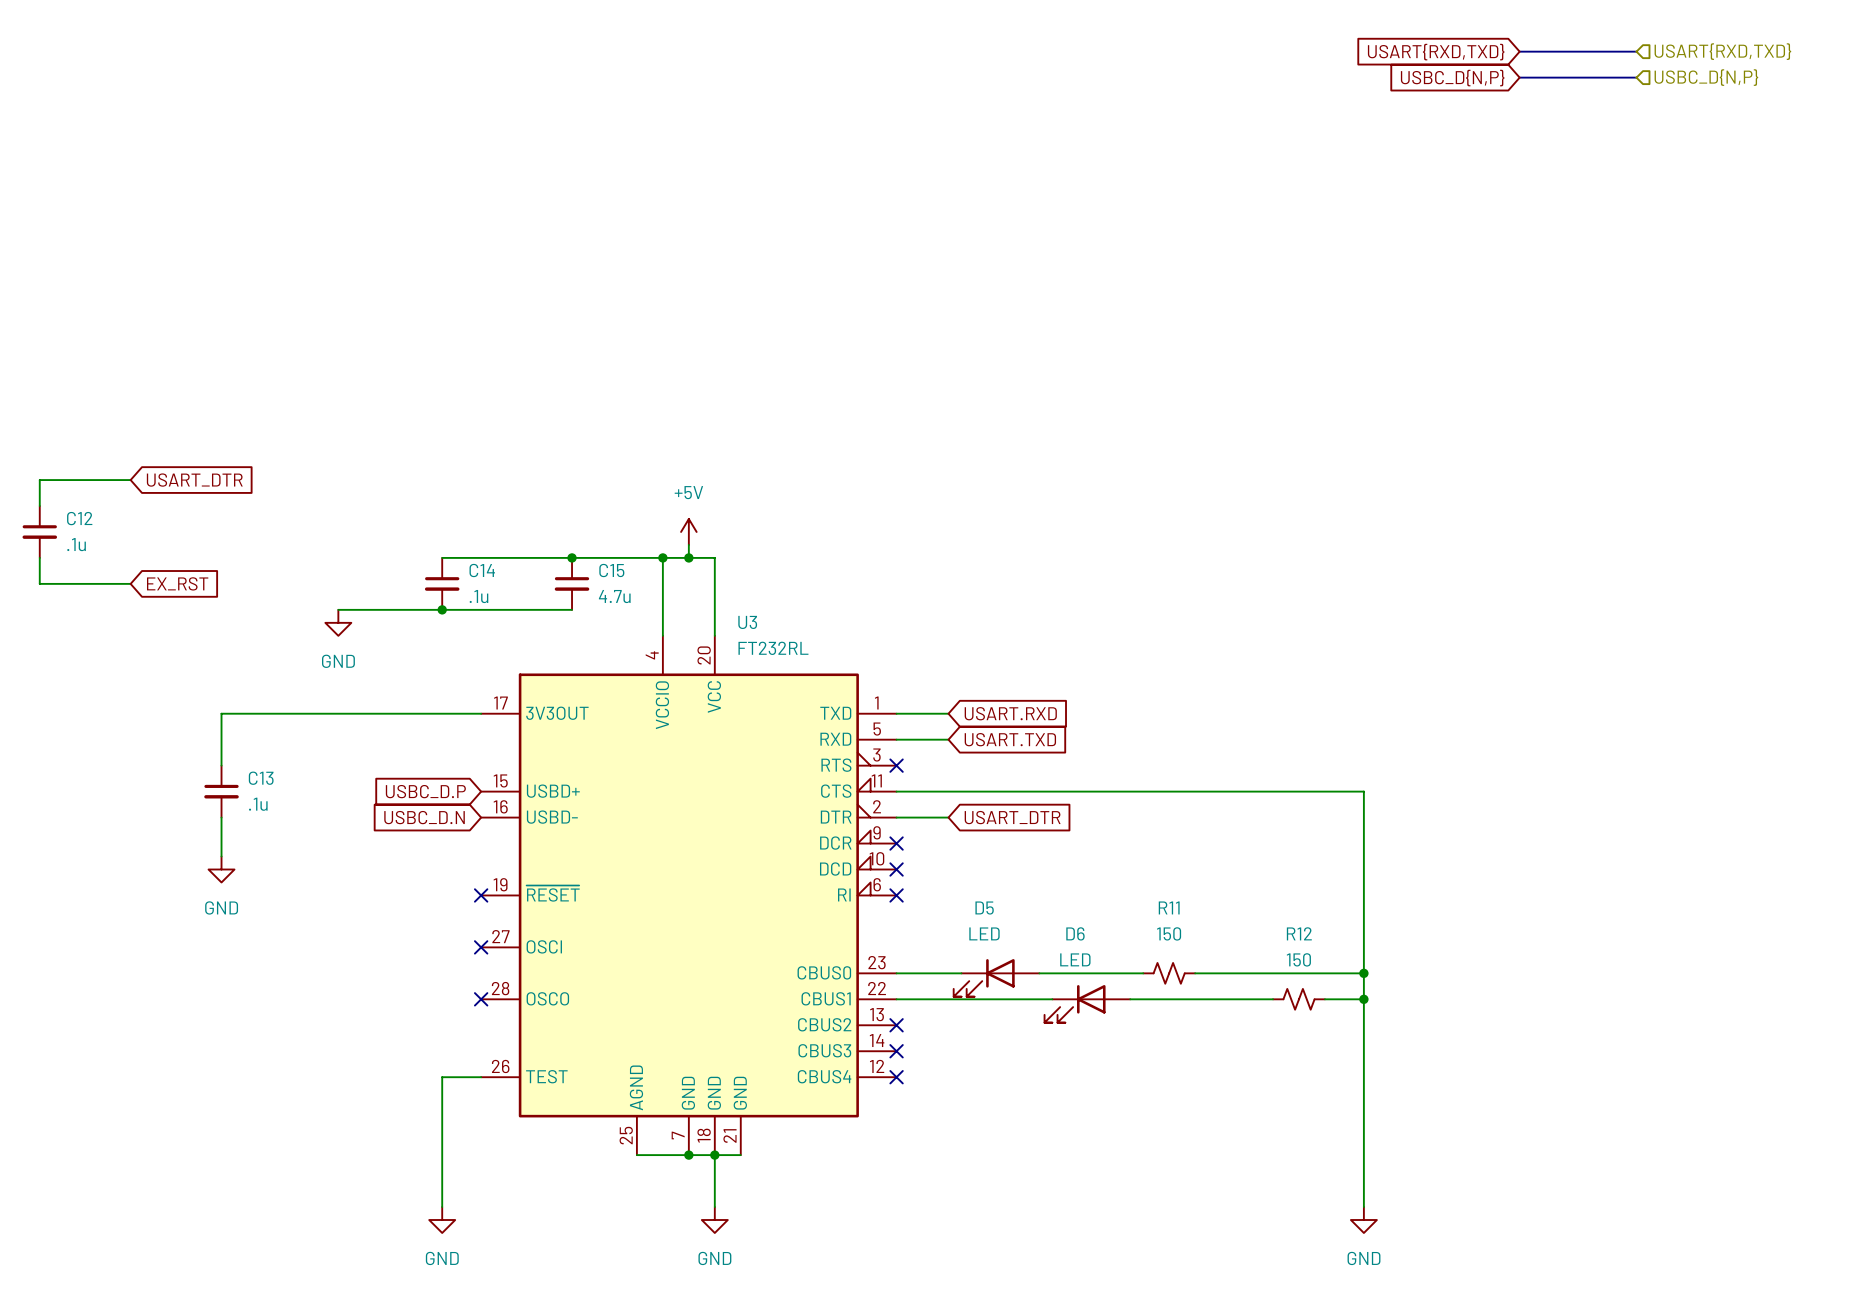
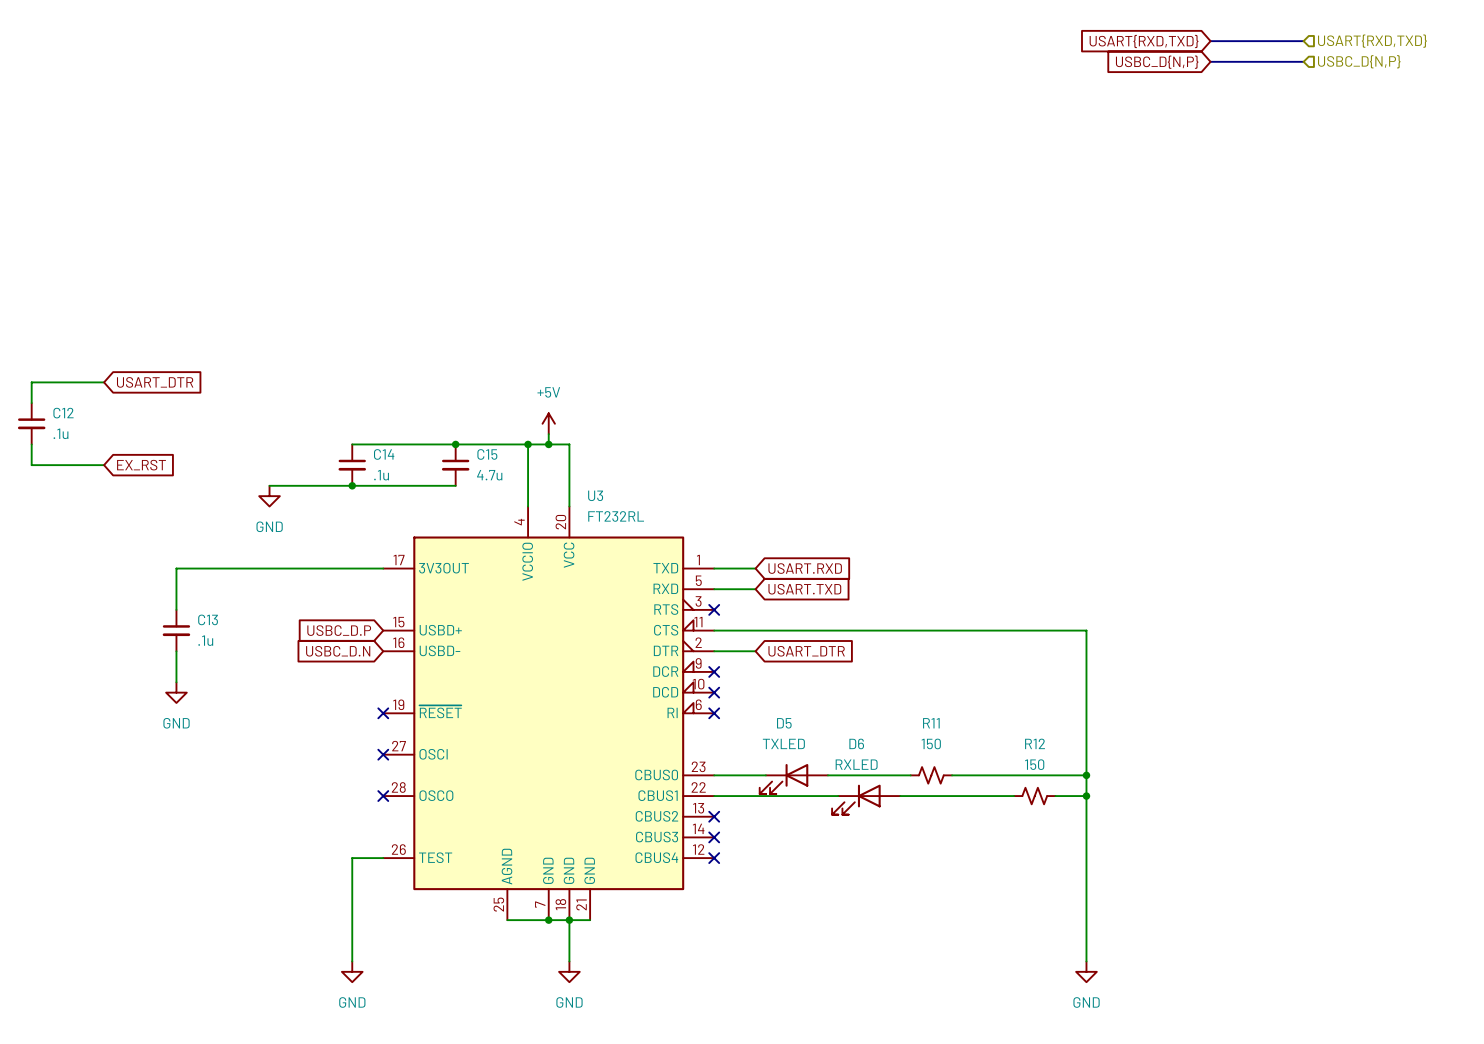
D5 value: LED (984, 933) -> TXLED (783, 743)
D6 value: LED (1075, 959) -> RXLED (856, 764)

